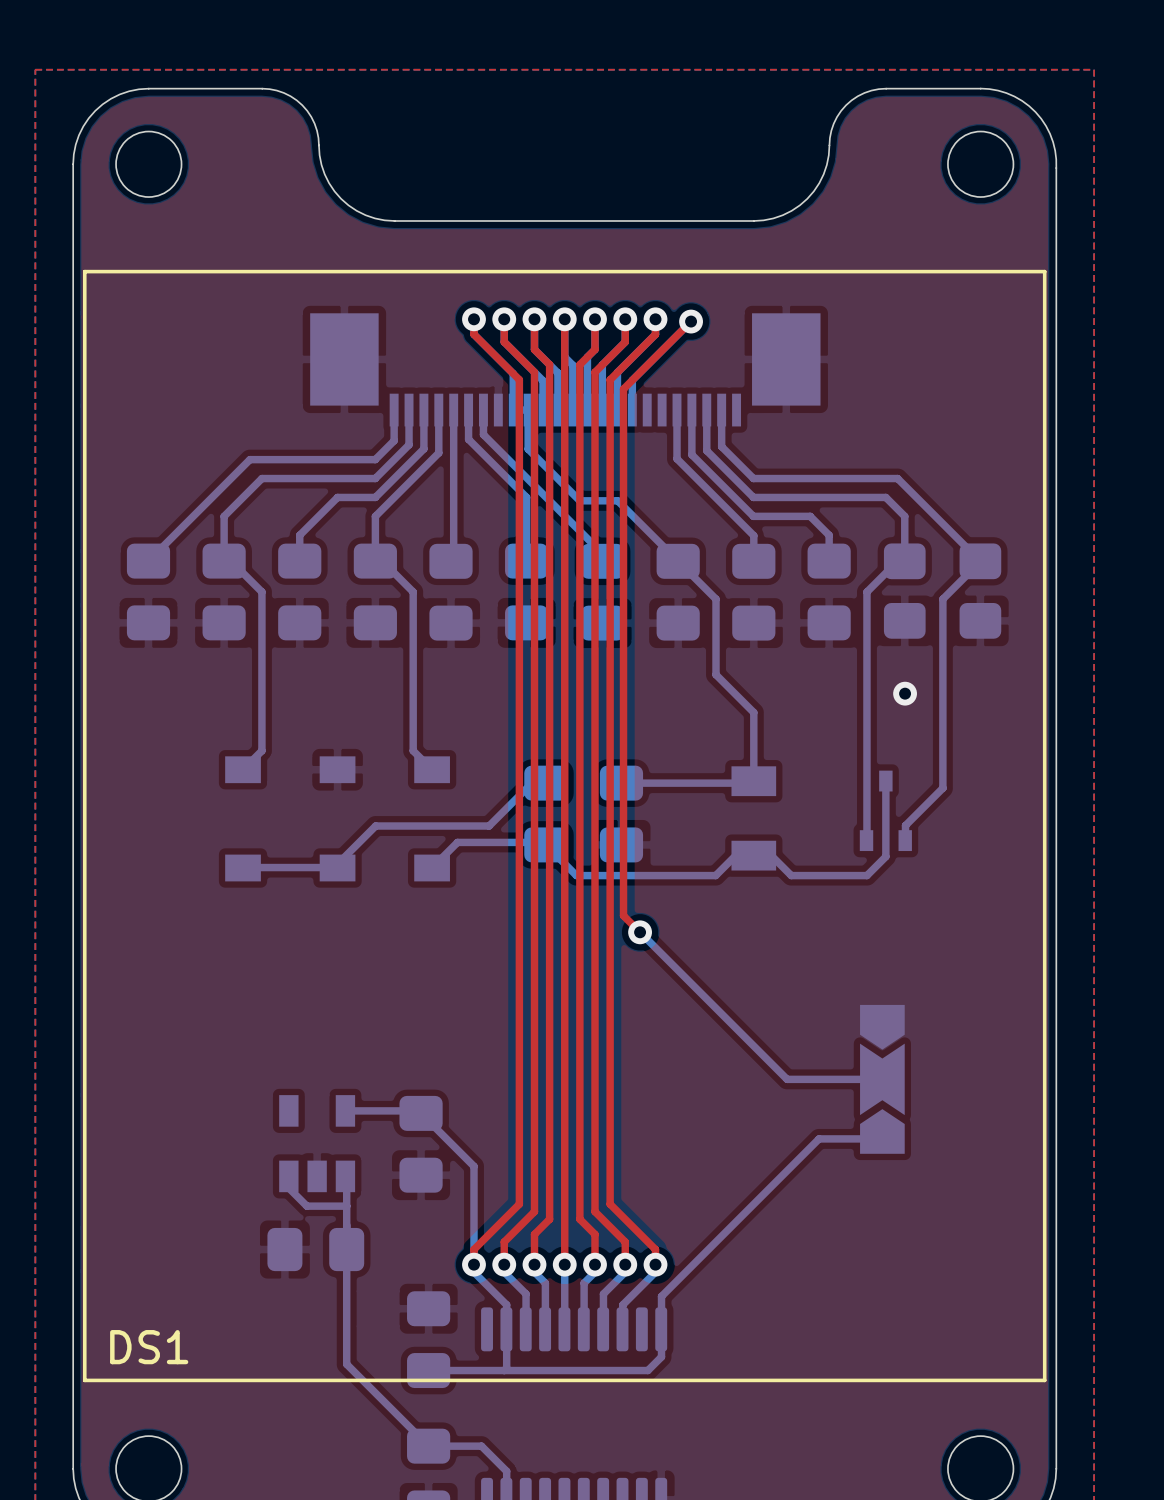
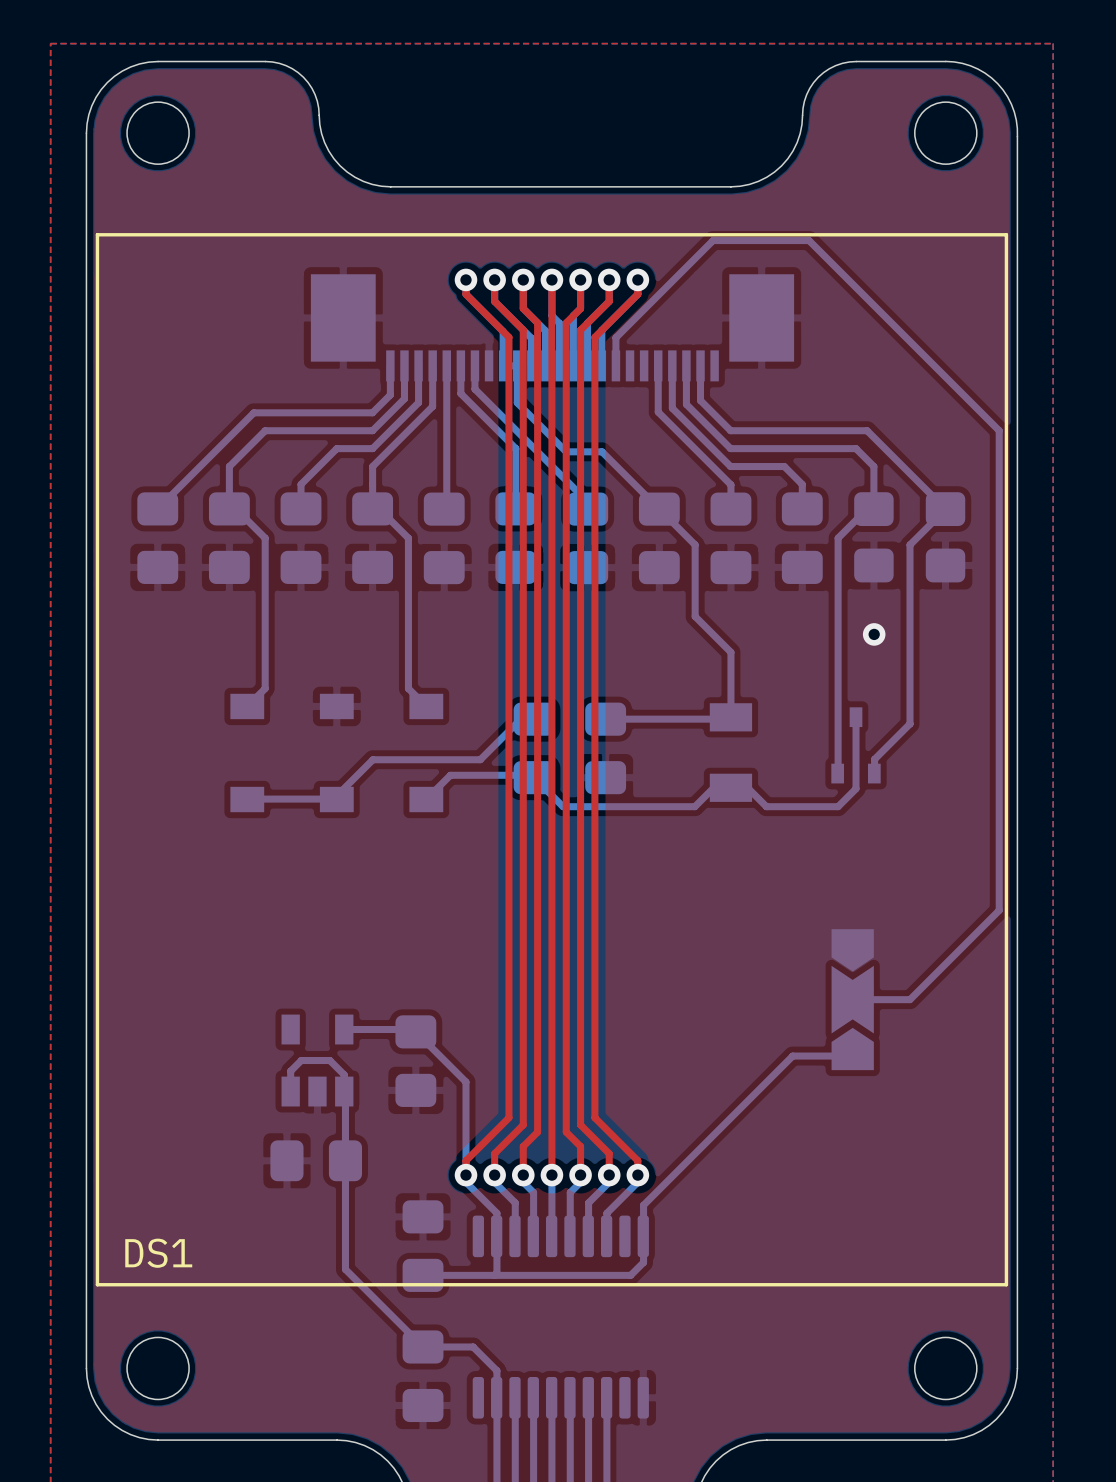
top track: (691, 321) (623, 389) (623, 915) (640, 932) -> none
via: (691, 321) -> none
bottom track: (640, 932) (787, 1079) (882, 1079) -> (671, 282) (713, 240) (809, 240) (999, 430) (999, 910) (909, 999) (852, 999)
via: (640, 932) -> none
bottom track: (288, 1176) (288, 1188) (306, 1206) (346, 1206) -> (290, 1091) (290, 1071) (301, 1060) (329, 1060) (344, 1074) (344, 1091)

